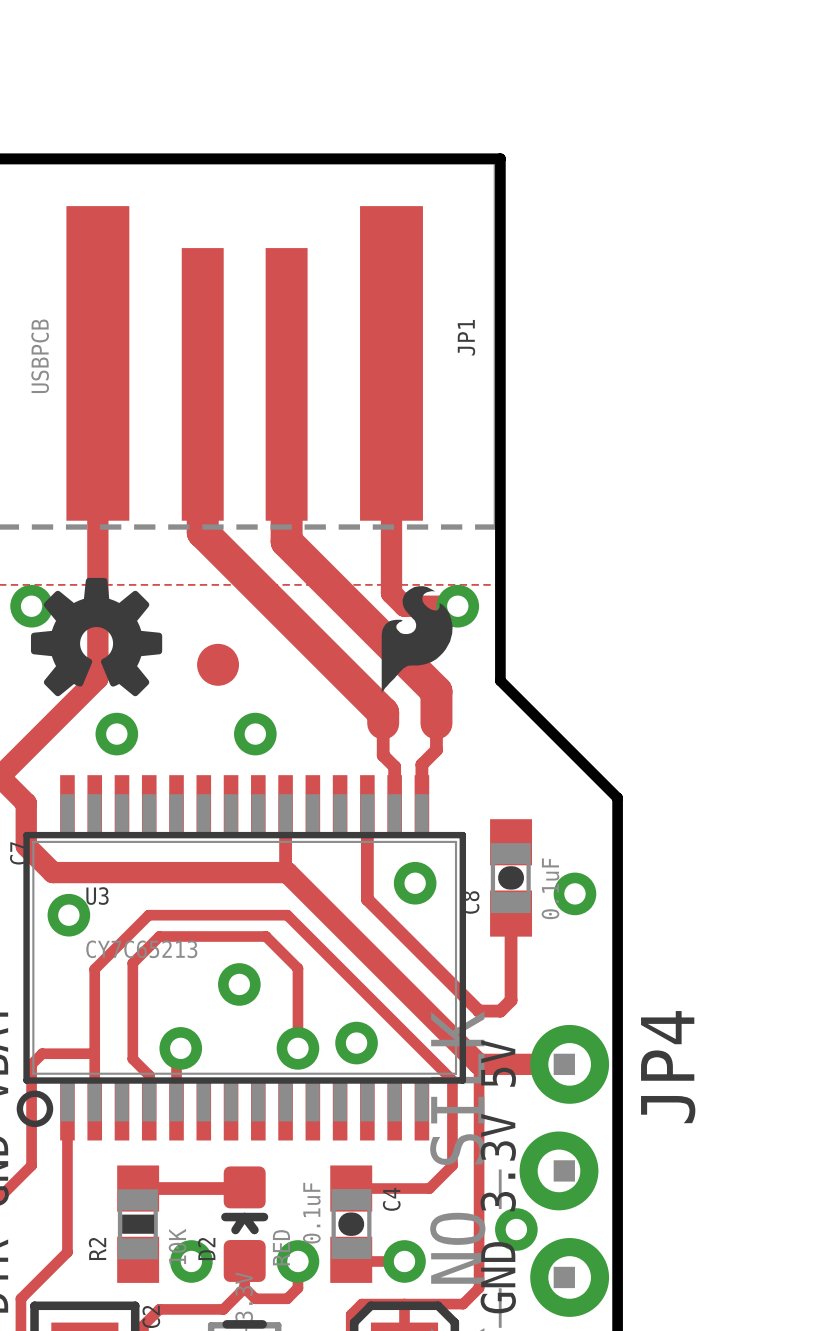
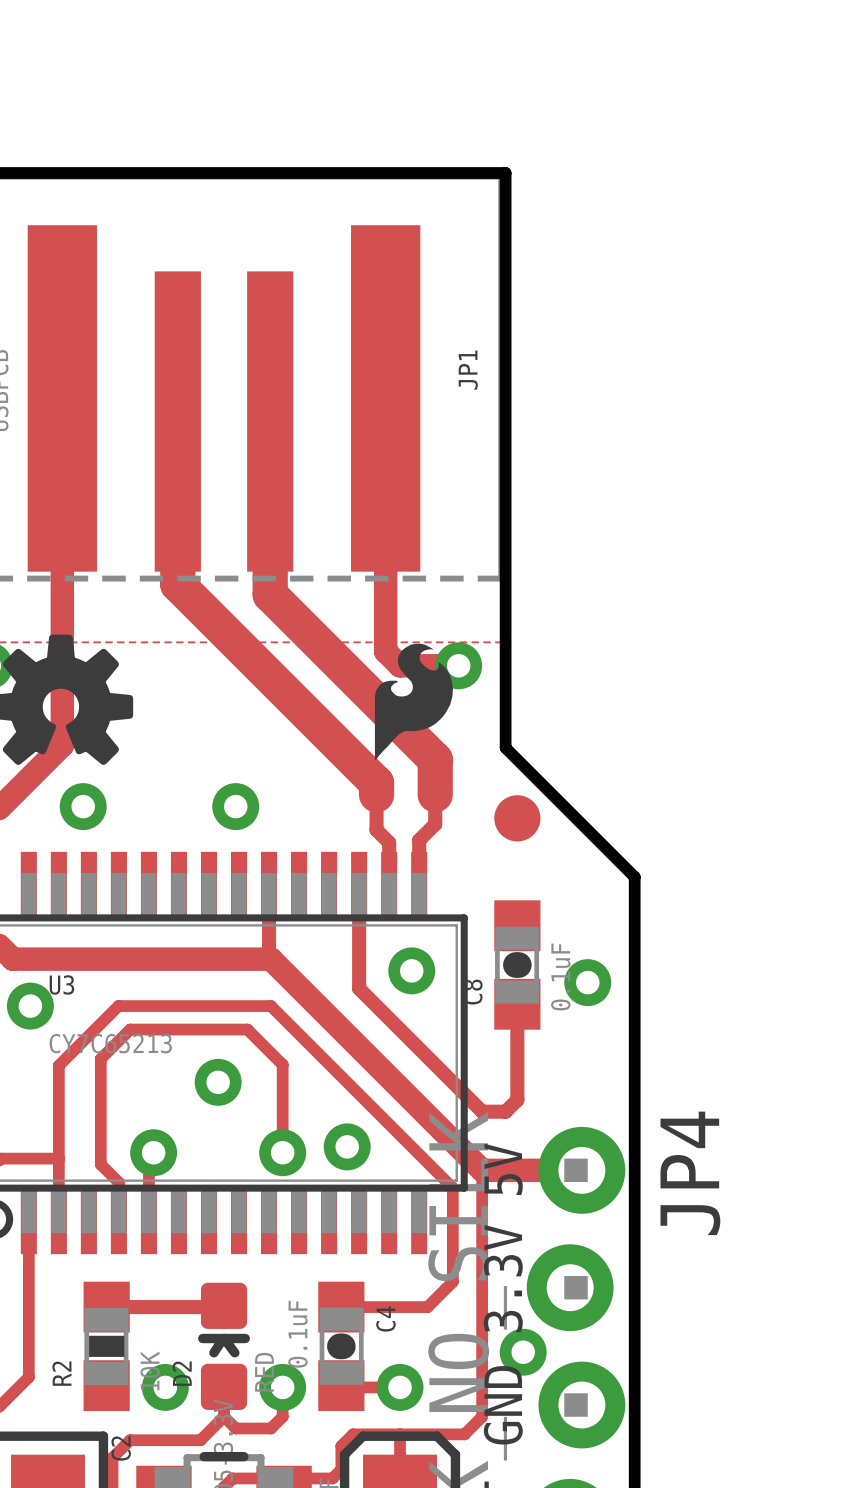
part position: (218, 664) -> (517, 818)

